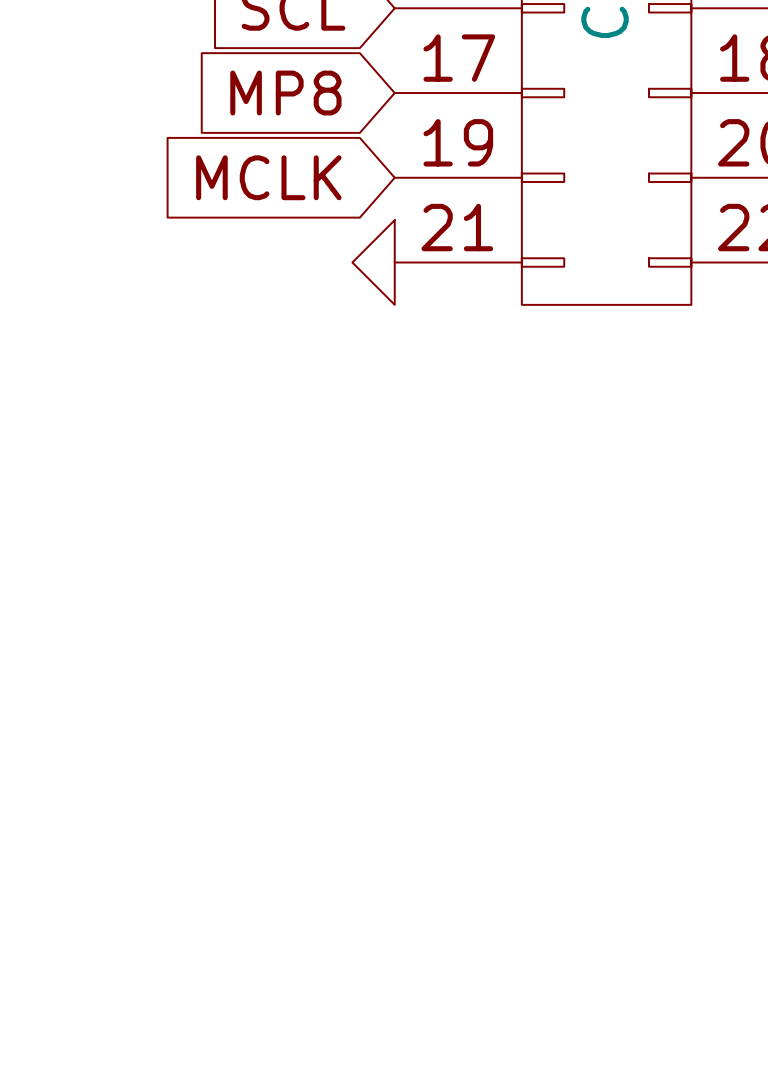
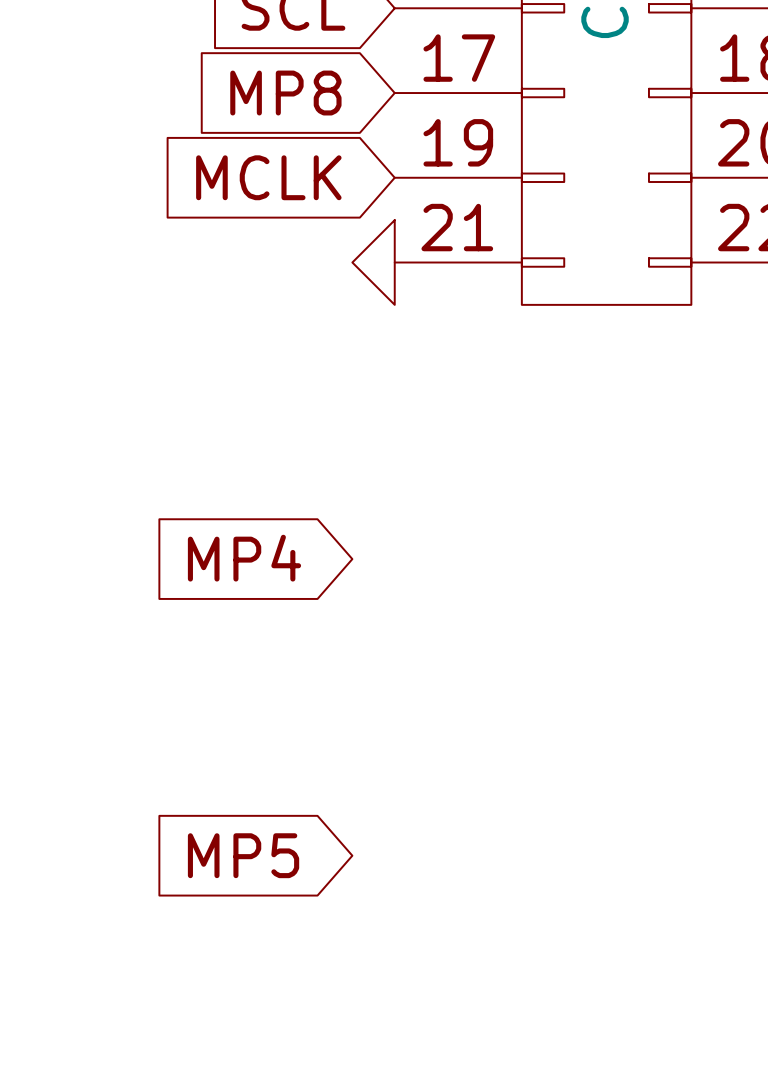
global label: none -> MP4 (244, 558)
global label: none -> MP5 (243, 855)

